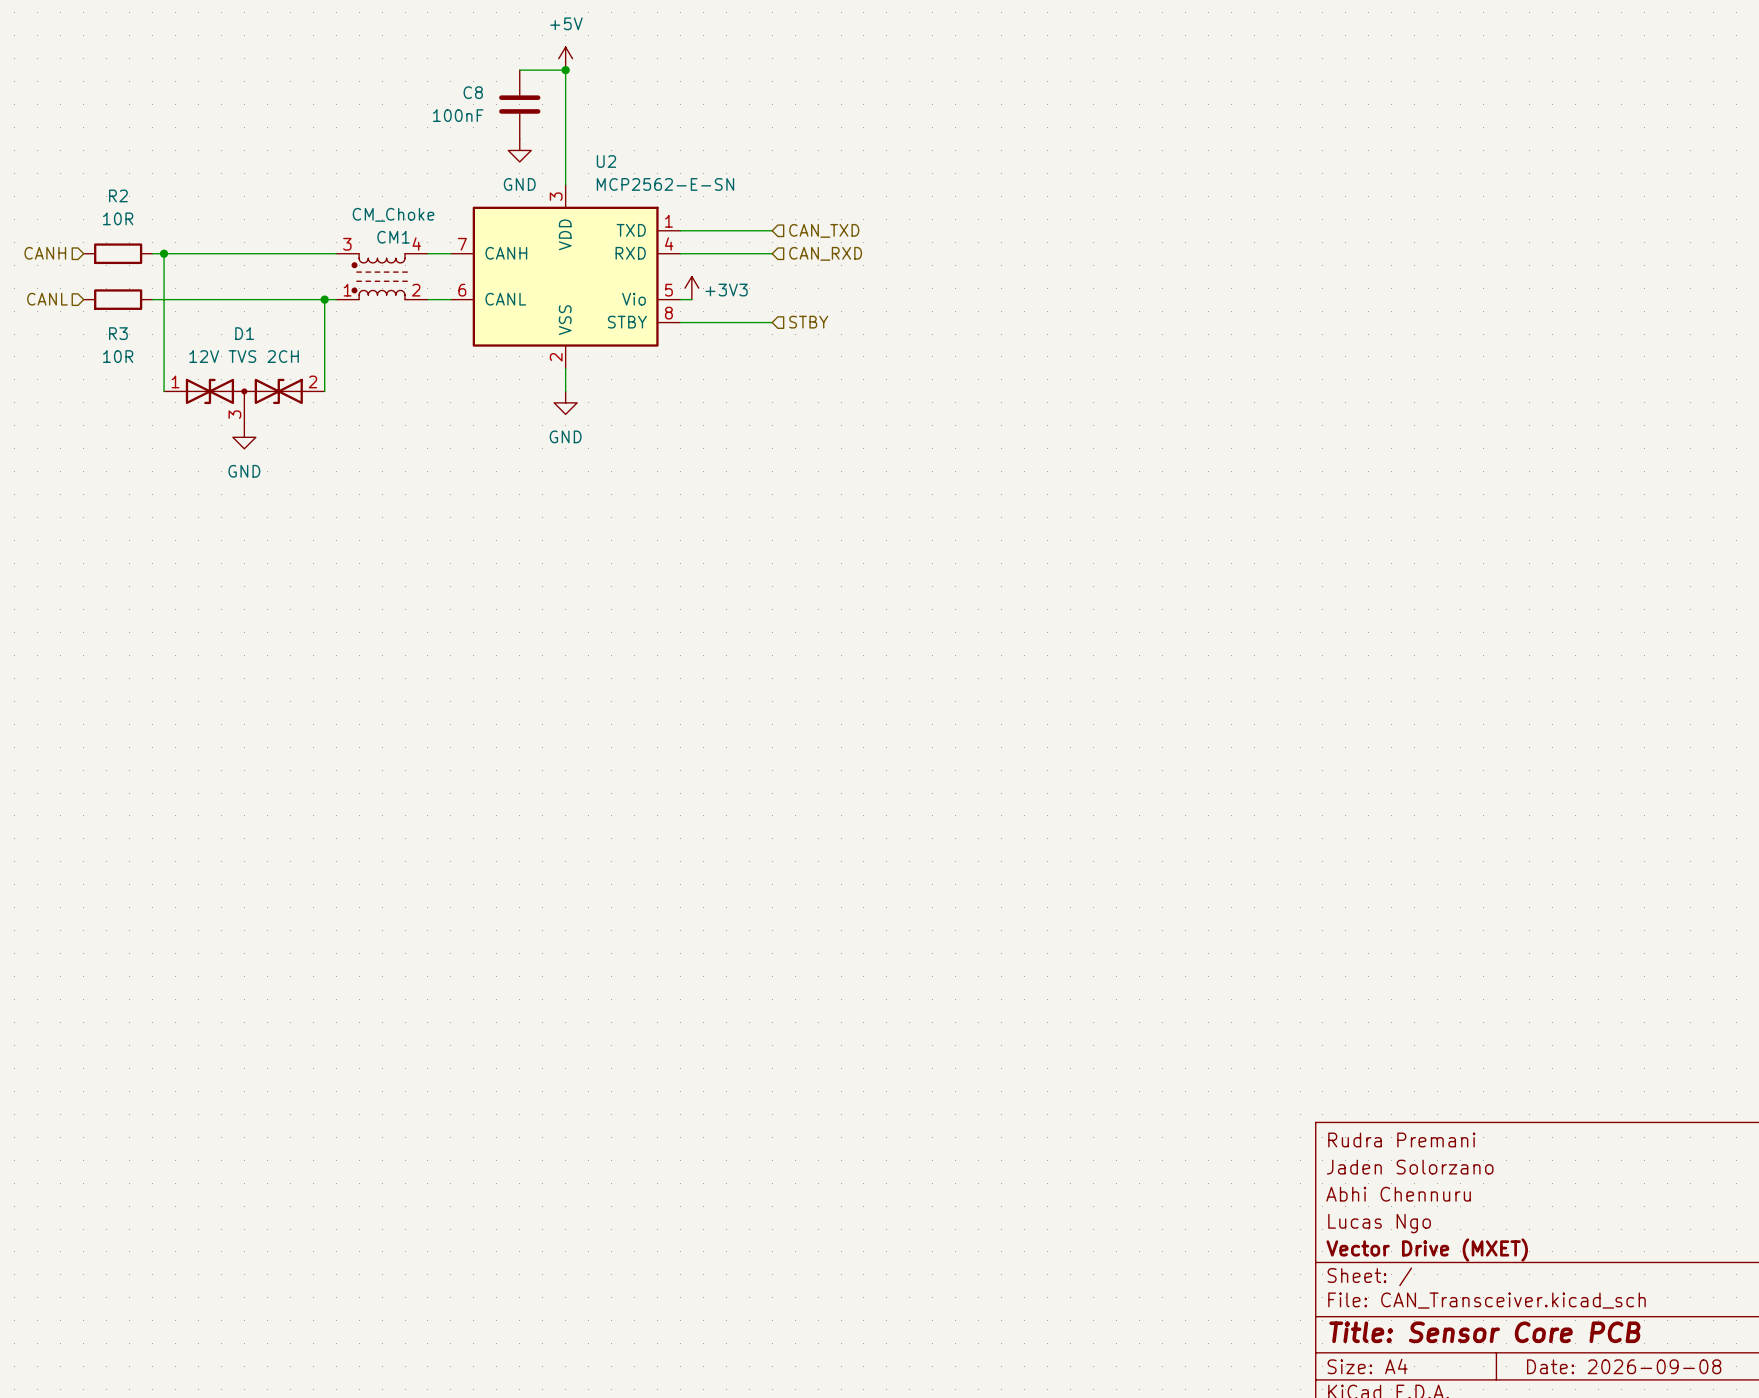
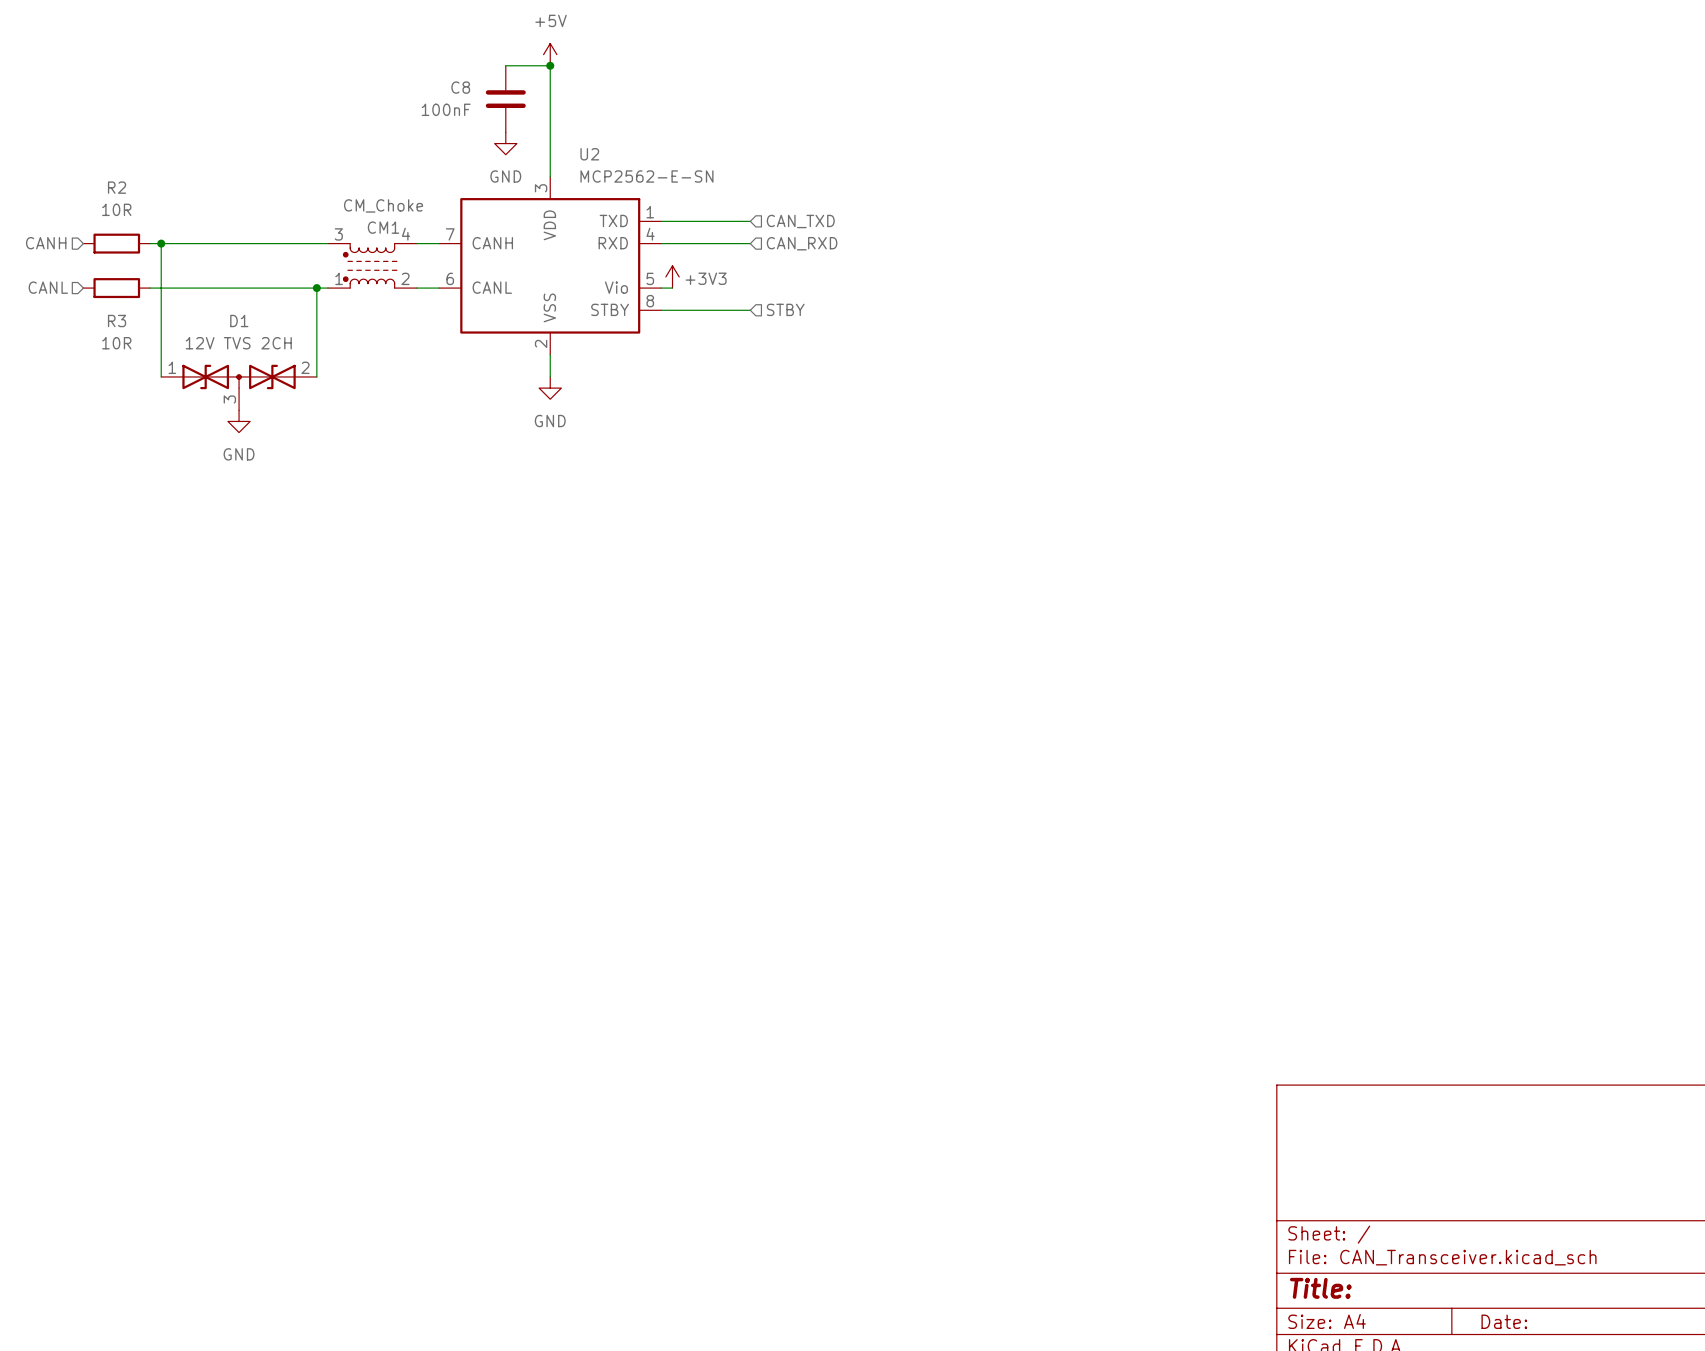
title block: Rudra Premani (1401, 1139) -> none
title block: Jaden Solorzano (1410, 1167) -> none
title block: Abhi Chennuru (1398, 1194) -> none
title block: Lucas Ngo (1379, 1223) -> none
title block: Vector Drive (MXET) (1427, 1250) -> none
title block: Title: Sensor Core PCB (1484, 1332) -> Title: (1320, 1288)
title block: Date: 2026-09-08 (1624, 1366) -> Date: (1504, 1321)

